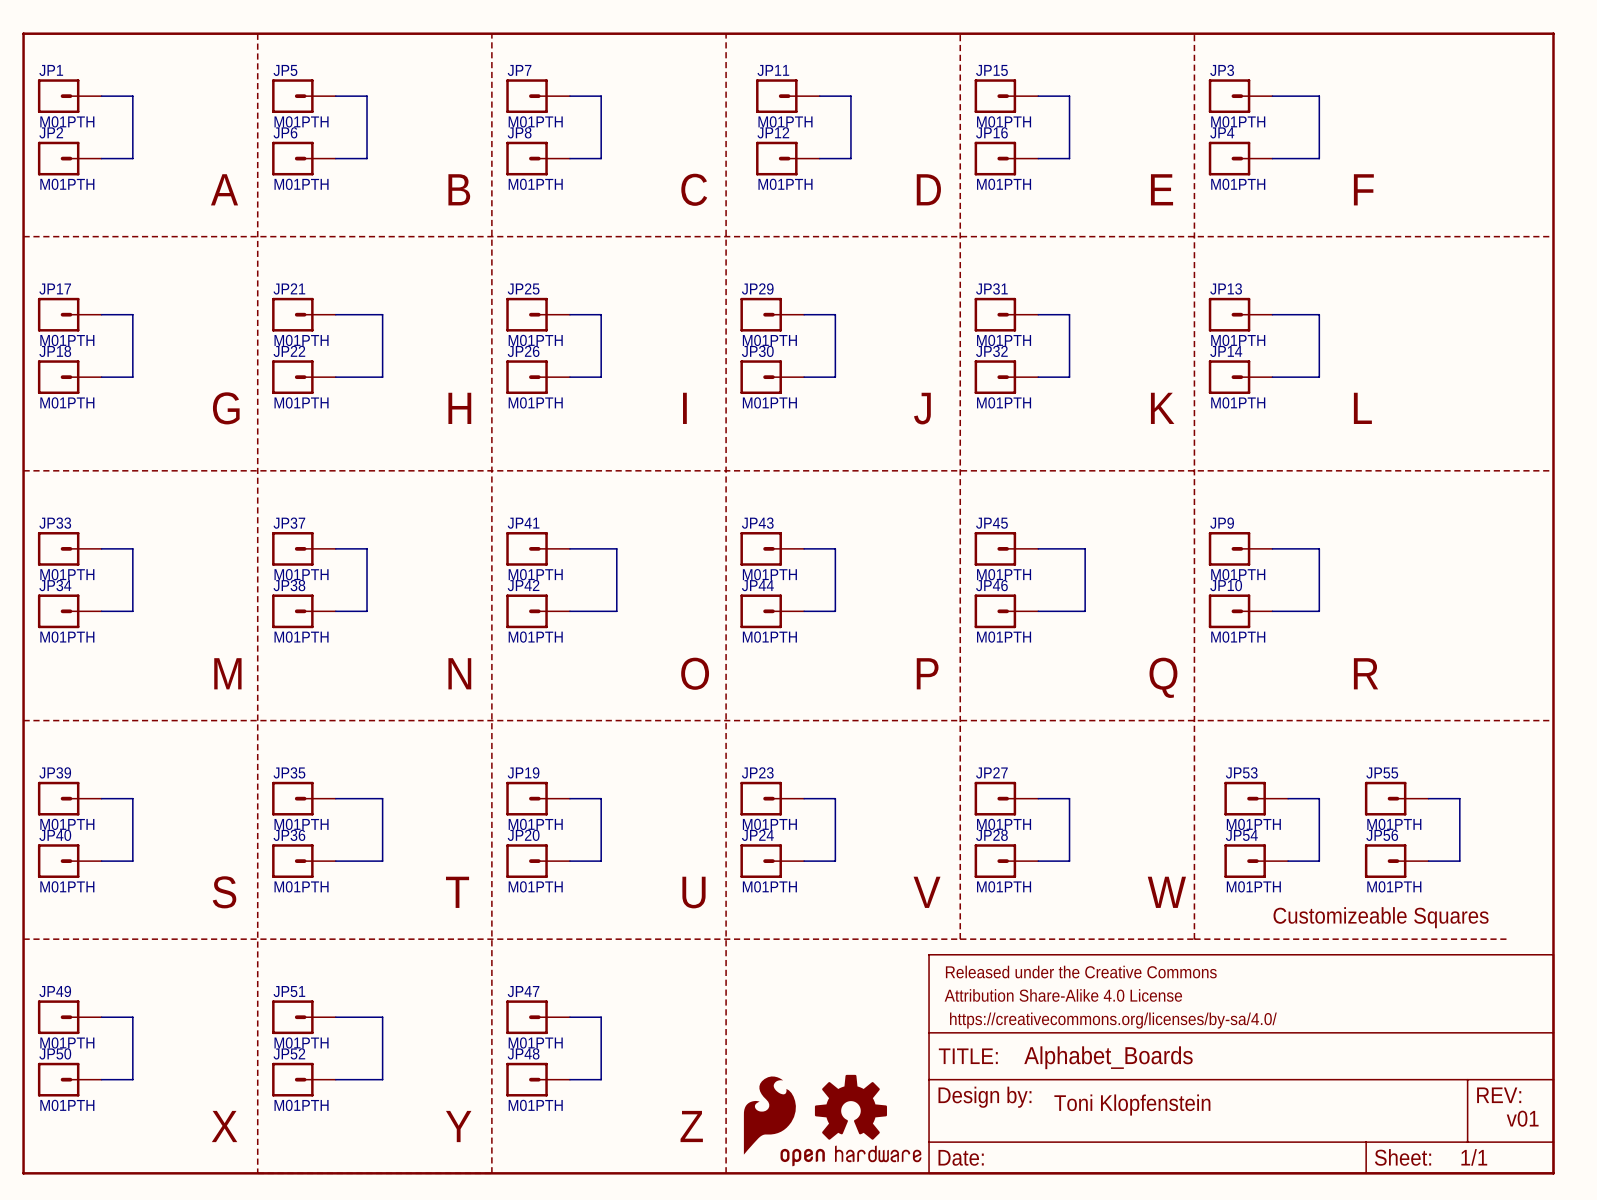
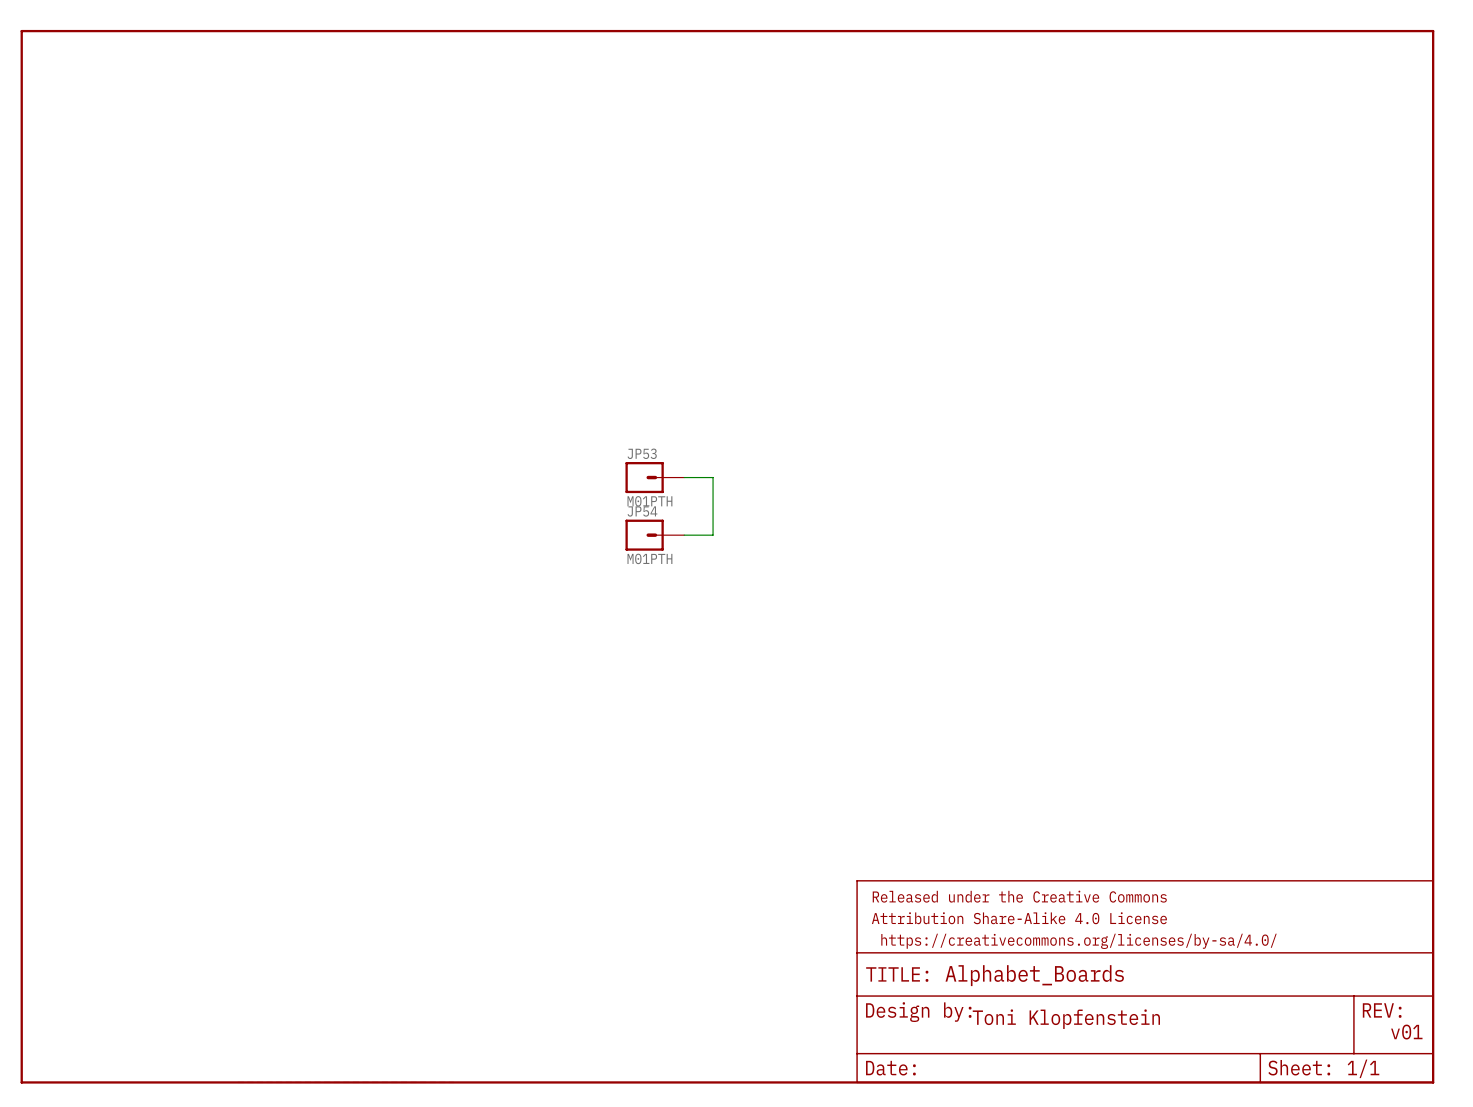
line: (257, 33) (257, 1173) -> none
line: (491, 33) (491, 1173) -> none
line: (726, 33) (726, 1173) -> none
line: (960, 33) (960, 939) -> none
line: (1194, 33) (1194, 939) -> none
JP1: M01PTH (69, 96) -> none
wire: (101, 96) (132, 96) (132, 158) (101, 158) -> none
JP5: M01PTH (303, 96) -> none
wire: (335, 96) (367, 96) (367, 158) (335, 158) -> none
JP7: M01PTH (538, 96) -> none
wire: (569, 96) (601, 96) (601, 158) (569, 158) -> none
JP11: M01PTH (787, 96) -> none
wire: (819, 96) (850, 96) (850, 158) (819, 158) -> none
JP15: M01PTH (1006, 96) -> none
wire: (1038, 96) (1069, 96) (1069, 158) (1038, 158) -> none
JP3: M01PTH (1240, 96) -> none
wire: (1272, 96) (1319, 96) (1319, 158) (1272, 158) -> none
JP2: M01PTH (69, 158) -> none
JP6: M01PTH (303, 158) -> none
JP8: M01PTH (538, 158) -> none
JP12: M01PTH (787, 158) -> none
JP16: M01PTH (1006, 158) -> none
JP4: M01PTH (1240, 158) -> none
text: A (224, 189) -> none
text: B (459, 189) -> none
text: C (694, 189) -> none
text: D (928, 189) -> none
text: E (1162, 189) -> none
text: F (1363, 189) -> none
line: (23, 236) (1553, 236) -> none
JP17: M01PTH (69, 314) -> none
wire: (101, 314) (132, 314) (132, 377) (101, 377) -> none
JP21: M01PTH (303, 314) -> none
wire: (335, 314) (382, 314) (382, 377) (335, 377) -> none
JP25: M01PTH (538, 314) -> none
wire: (569, 314) (601, 314) (601, 377) (569, 377) -> none
JP29: M01PTH (772, 314) -> none
wire: (804, 314) (835, 314) (835, 377) (804, 377) -> none
JP31: M01PTH (1006, 314) -> none
wire: (1038, 314) (1069, 314) (1069, 377) (1038, 377) -> none
JP13: M01PTH (1240, 314) -> none
wire: (1272, 314) (1319, 314) (1319, 377) (1272, 377) -> none
JP18: M01PTH (69, 377) -> none
JP22: M01PTH (303, 377) -> none
JP26: M01PTH (538, 377) -> none
JP30: M01PTH (772, 377) -> none
JP32: M01PTH (1006, 377) -> none
JP14: M01PTH (1240, 377) -> none
text: G (226, 408) -> none
text: H (459, 408) -> none
text: I (684, 408) -> none
text: J (922, 408) -> none
text: K (1162, 408) -> none
text: L (1362, 408) -> none
line: (23, 470) (1553, 470) -> none
JP33: M01PTH (69, 548) -> none
wire: (101, 548) (132, 548) (132, 611) (101, 611) -> none
JP37: M01PTH (303, 548) -> none
wire: (335, 548) (367, 548) (367, 611) (335, 611) -> none
JP41: M01PTH (538, 548) -> none
wire: (569, 548) (616, 548) (616, 611) (569, 611) -> none
JP43: M01PTH (772, 548) -> none
wire: (804, 548) (835, 548) (835, 611) (804, 611) -> (684, 477) (713, 477) (713, 535) (684, 535)
JP45: M01PTH (1006, 548) -> none
wire: (1038, 548) (1085, 548) (1085, 611) (1038, 611) -> none
JP9: M01PTH (1240, 548) -> none
wire: (1272, 548) (1319, 548) (1319, 611) (1272, 611) -> none
JP34: M01PTH (69, 611) -> none
JP38: M01PTH (303, 611) -> none
JP42: M01PTH (538, 611) -> none
JP44: M01PTH (772, 611) -> none
JP46: M01PTH (1006, 611) -> none
JP10: M01PTH (1240, 611) -> none
text: M (227, 673) -> none
text: N (459, 673) -> none
text: O (695, 673) -> none
text: P (927, 673) -> none
text: R (1366, 673) -> none
text: Q (1163, 677) -> none
line: (23, 720) (1553, 720) -> none
JP39: M01PTH (69, 798) -> none
wire: (101, 798) (132, 798) (132, 861) (101, 861) -> none
JP35: M01PTH (303, 798) -> none
wire: (335, 798) (382, 798) (382, 861) (335, 861) -> none
JP19: M01PTH (538, 798) -> none
wire: (569, 798) (601, 798) (601, 861) (569, 861) -> none
JP23: M01PTH (772, 798) -> none
wire: (804, 798) (835, 798) (835, 861) (804, 861) -> none
JP27: M01PTH (1006, 798) -> none
wire: (1038, 798) (1069, 798) (1069, 861) (1038, 861) -> none
JP53 position: (1256, 798) -> (654, 477)
wire: (1288, 798) (1319, 798) (1319, 861) (1288, 861) -> none
JP55: M01PTH (1396, 798) -> none
wire: (1428, 798) (1459, 798) (1459, 861) (1428, 861) -> none
JP40: M01PTH (69, 861) -> none
JP36: M01PTH (303, 861) -> none
JP20: M01PTH (538, 861) -> none
JP24: M01PTH (772, 861) -> none
JP28: M01PTH (1006, 861) -> none
JP54 position: (1256, 861) -> (654, 535)
JP56: M01PTH (1396, 861) -> none
text: S (224, 892) -> none
text: T (457, 892) -> none
text: U (693, 892) -> none
text: V (927, 892) -> none
text: W (1166, 892) -> none
text: Customizeable Squares (1381, 917) -> none
line: (23, 939) (1506, 939) -> none
JP49: M01PTH (69, 1017) -> none
wire: (101, 1017) (132, 1017) (132, 1079) (101, 1079) -> none
JP51: M01PTH (303, 1017) -> none
wire: (335, 1017) (382, 1017) (382, 1079) (335, 1079) -> none
JP47: M01PTH (538, 1017) -> none
wire: (569, 1017) (601, 1017) (601, 1079) (569, 1079) -> none
JP50: M01PTH (69, 1079) -> none
JP52: M01PTH (303, 1079) -> none
JP48: M01PTH (538, 1079) -> none
part: (769, 1115) -> none
part: (850, 1120) -> none
text: X (224, 1126) -> none
text: Y (458, 1126) -> none
text: Z (691, 1126) -> none

